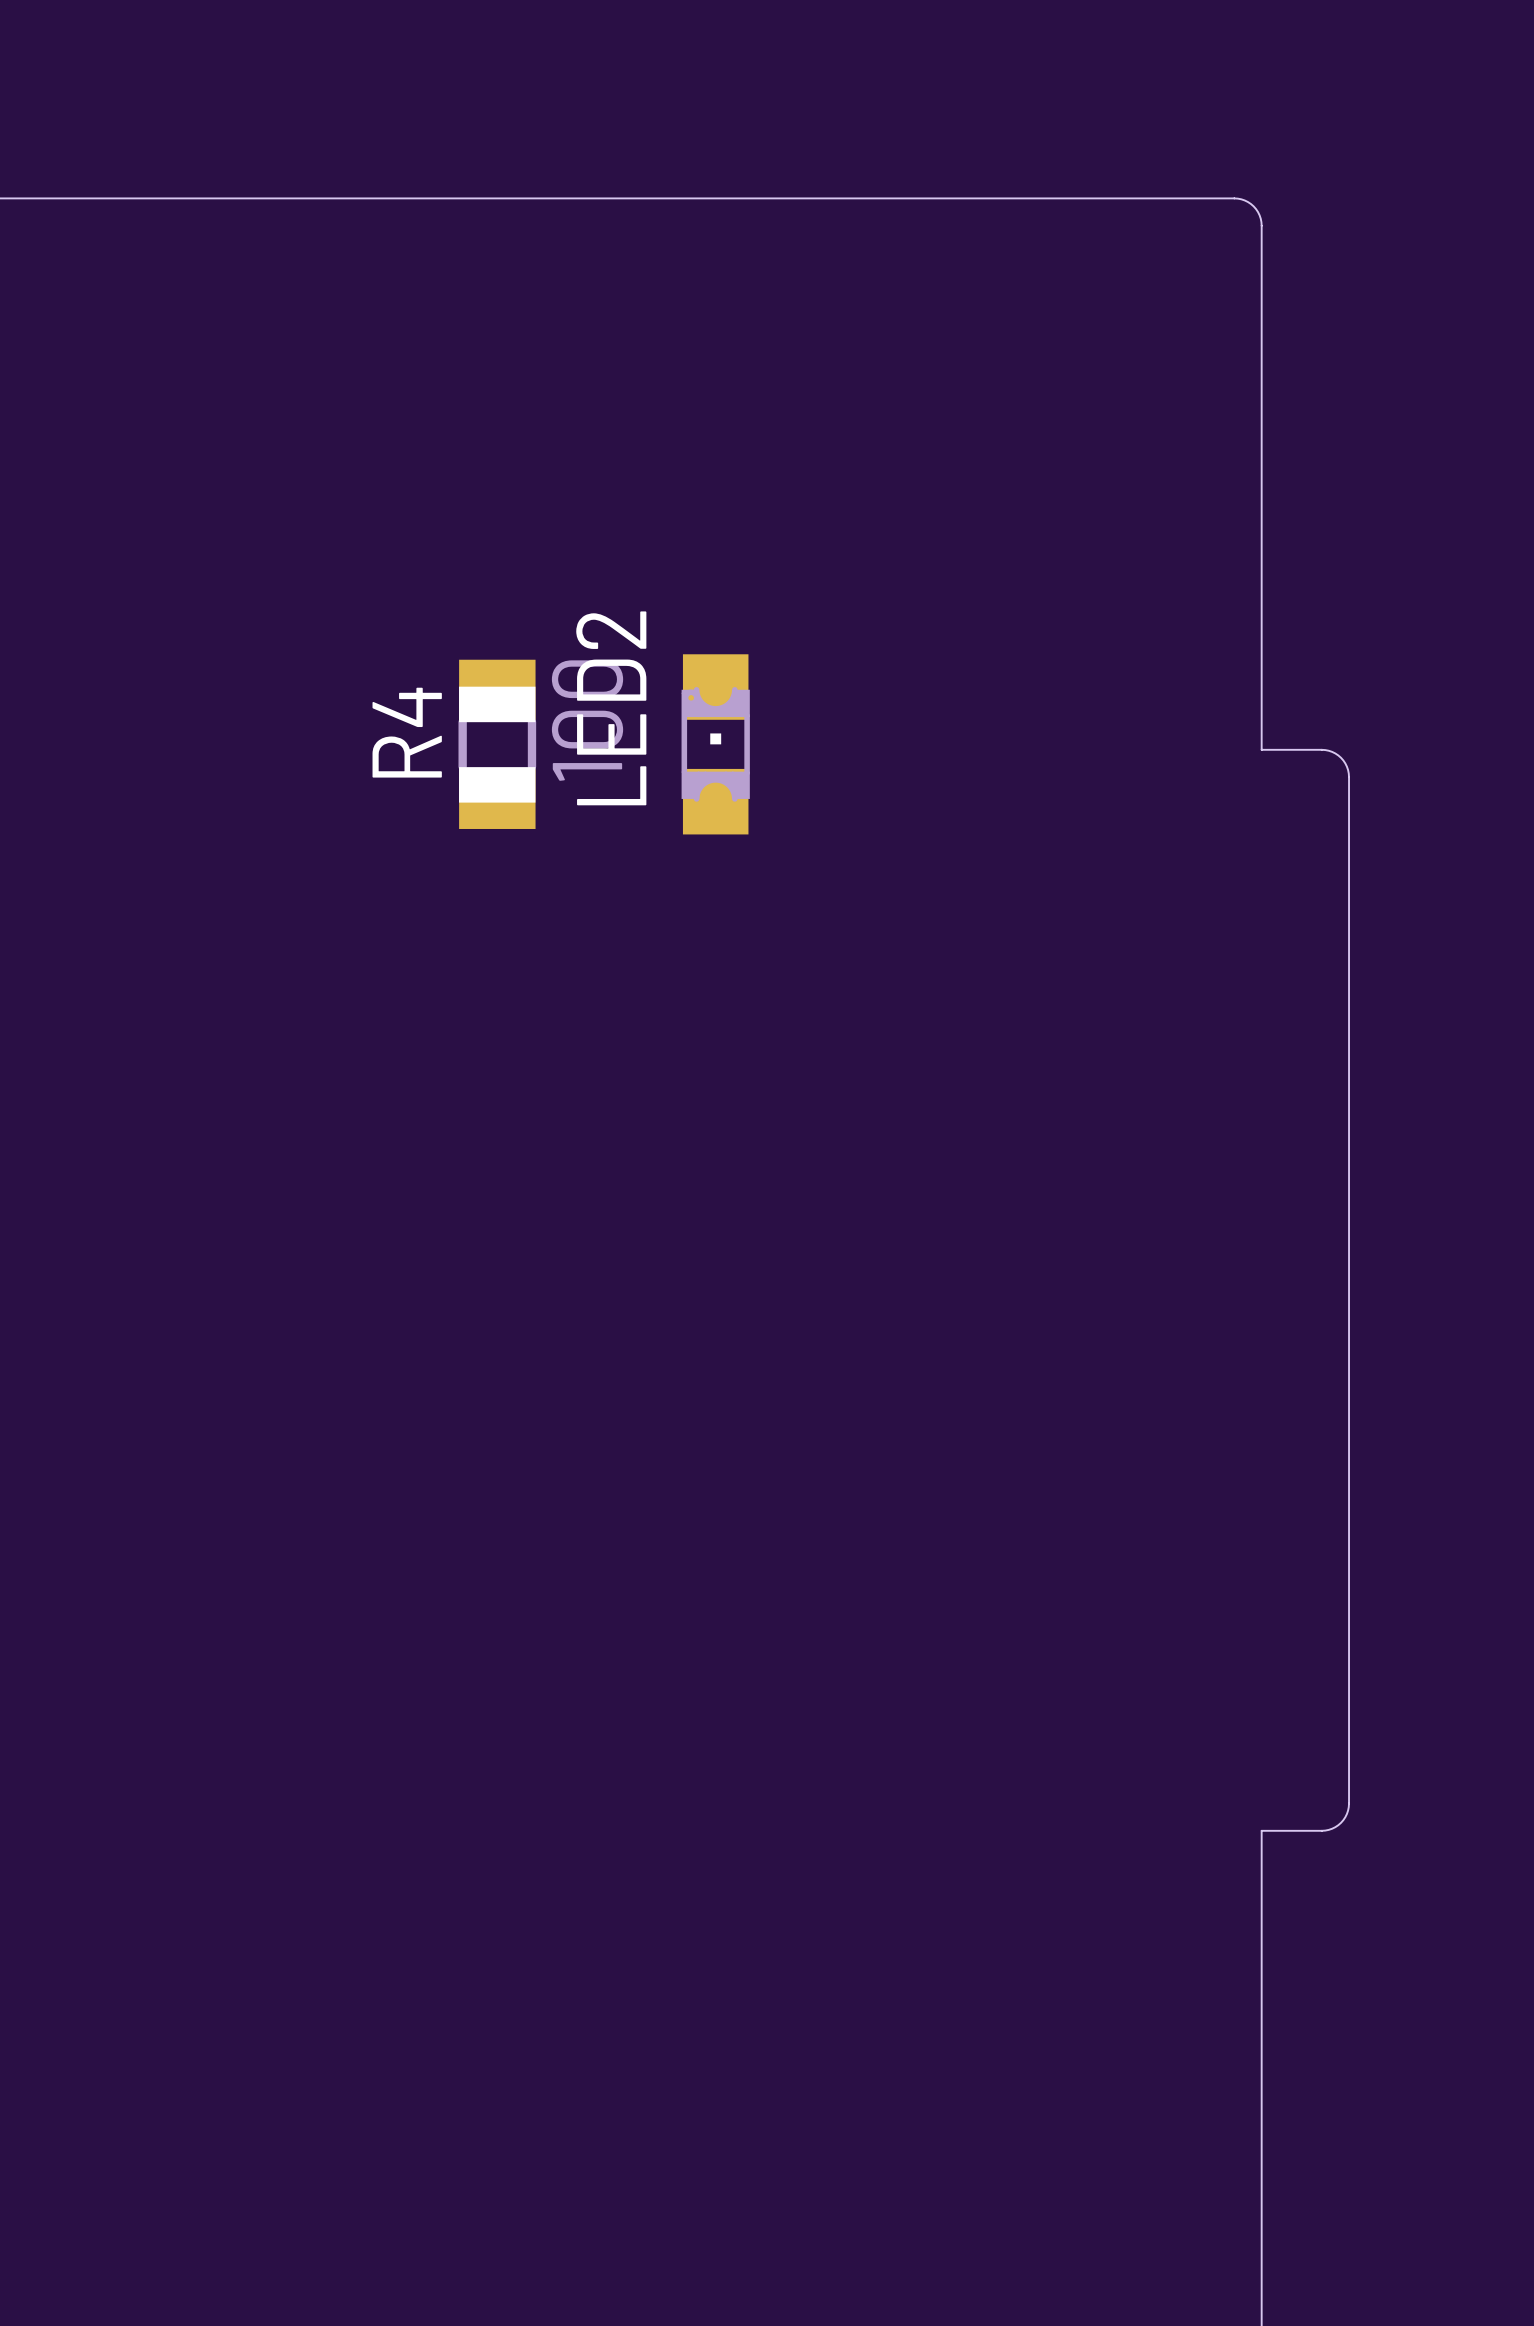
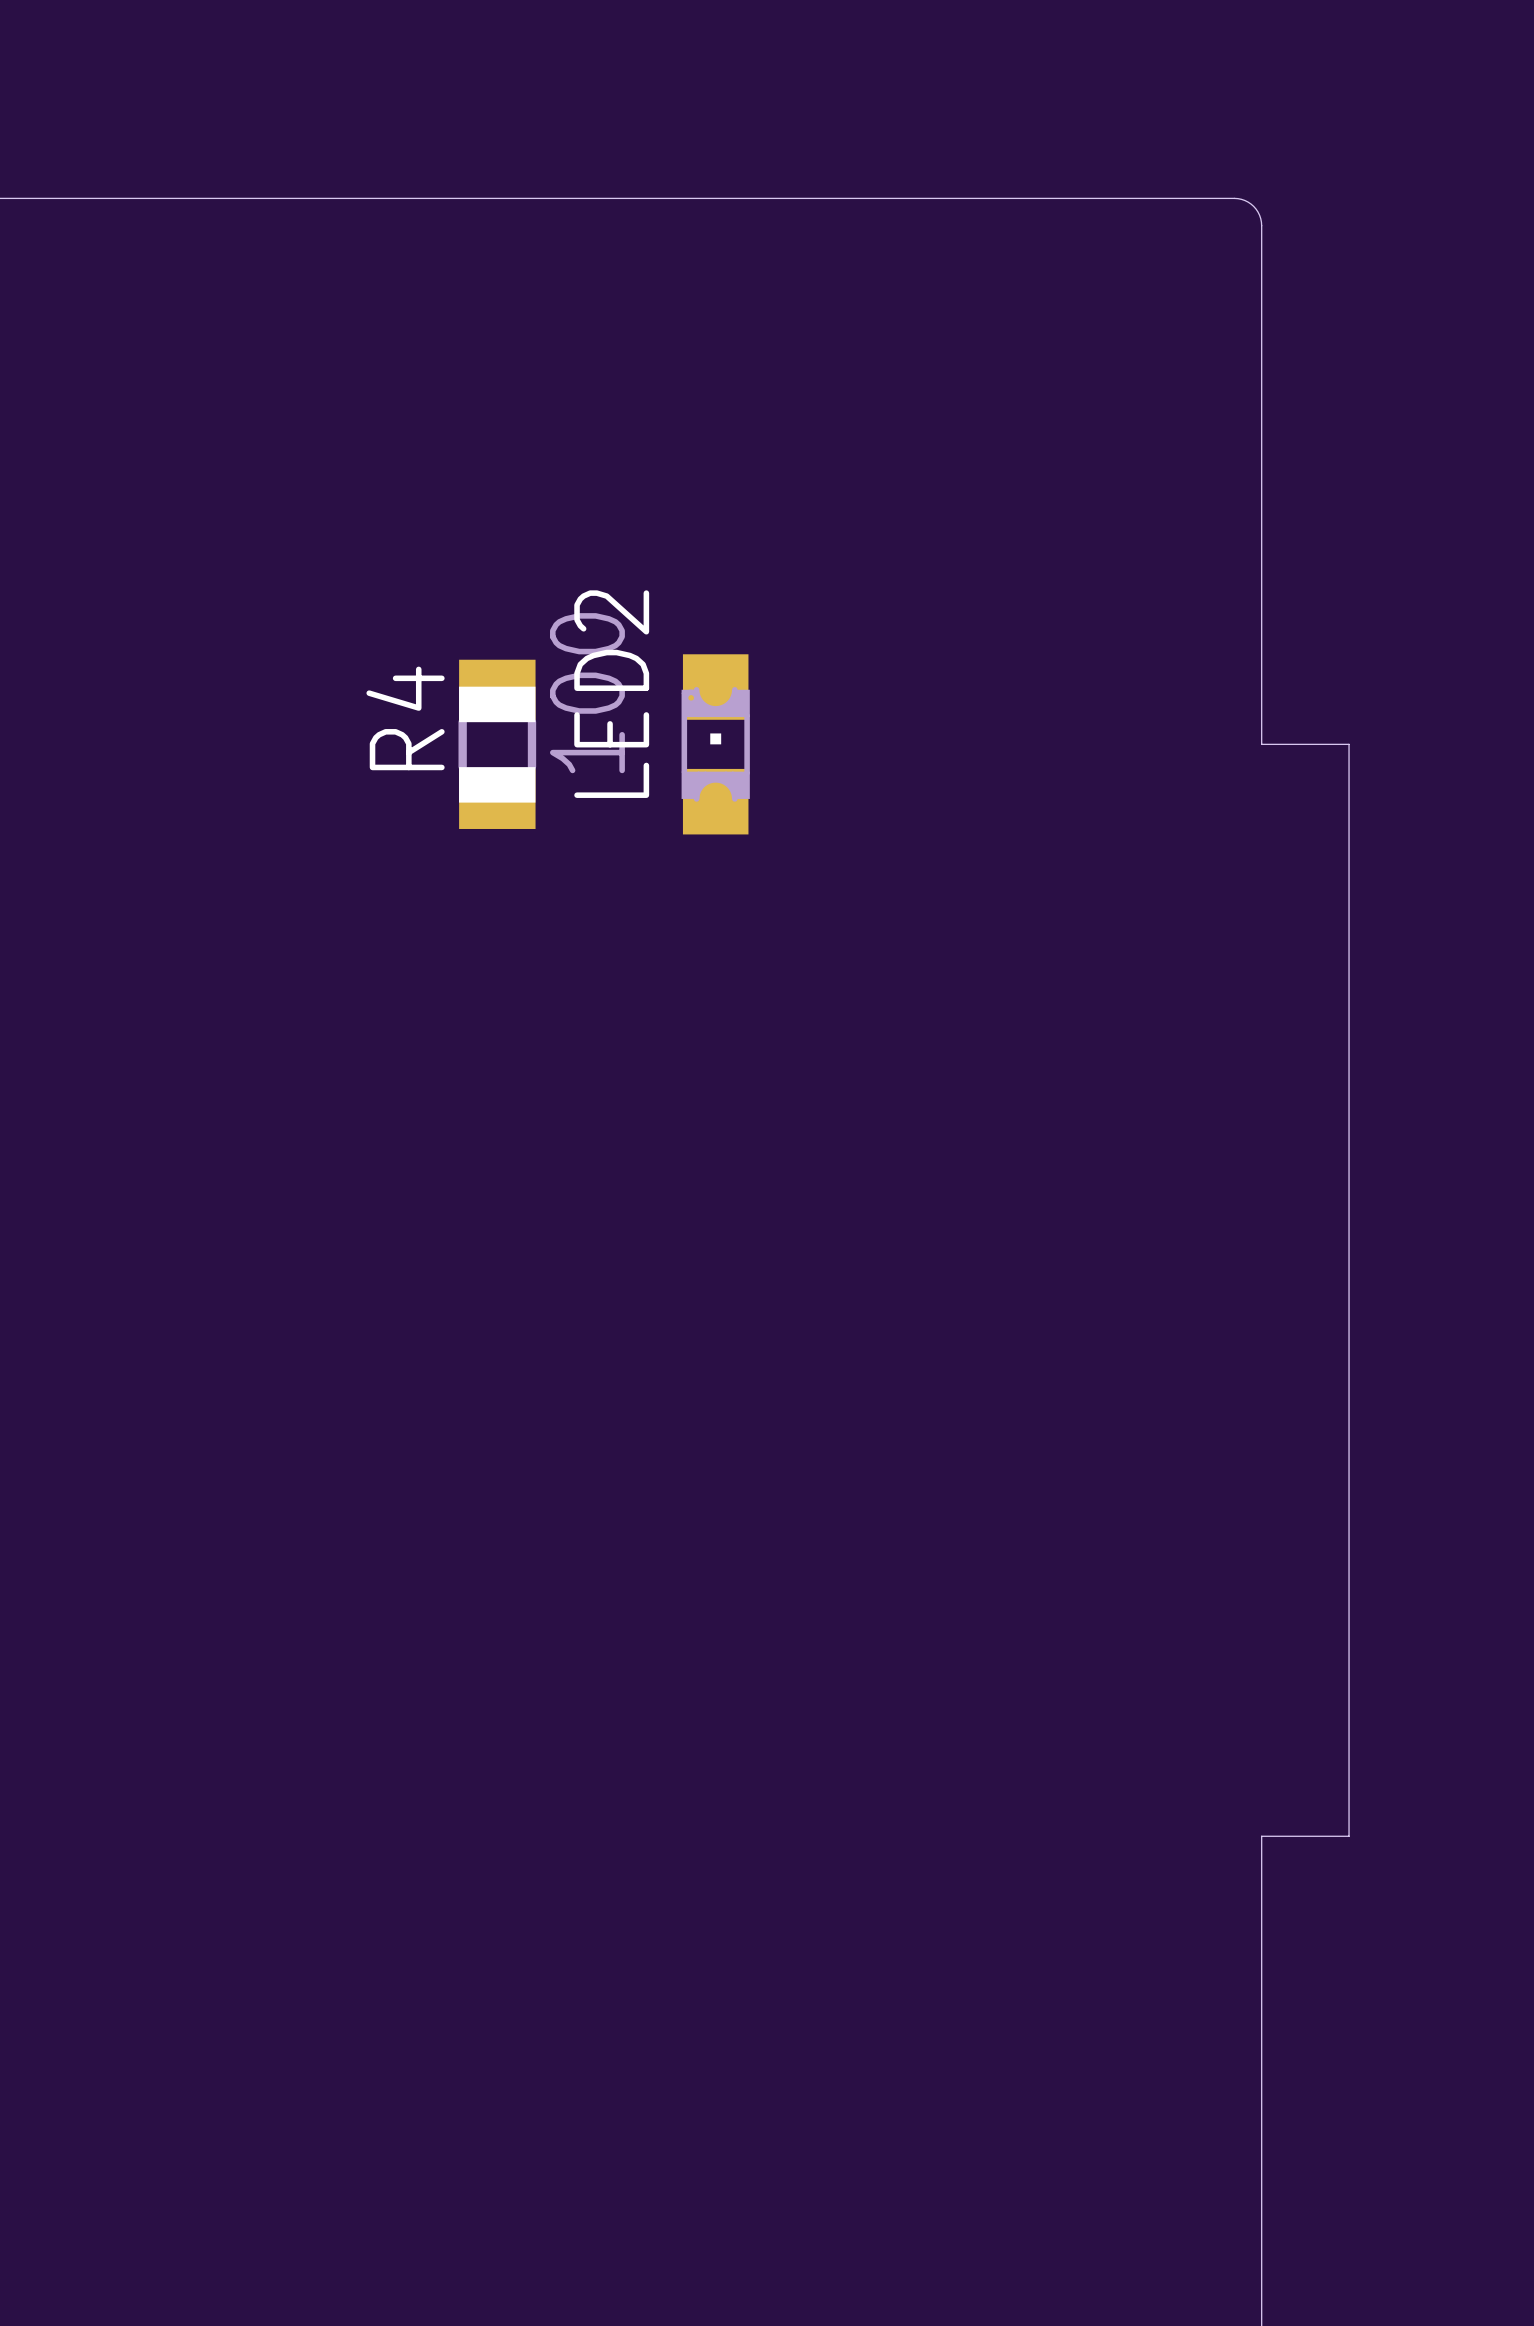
board edge: (1261, 744) (1261, 749) (1321, 749) (1332, 751) (1343, 760) (1349, 777) -> (1261, 744) (1349, 744) (1349, 777)
board edge: (1349, 1803) (1343, 1820) (1332, 1828) (1321, 1830) (1261, 1830) (1261, 1836) -> (1349, 1803) (1349, 1836) (1261, 1836)

